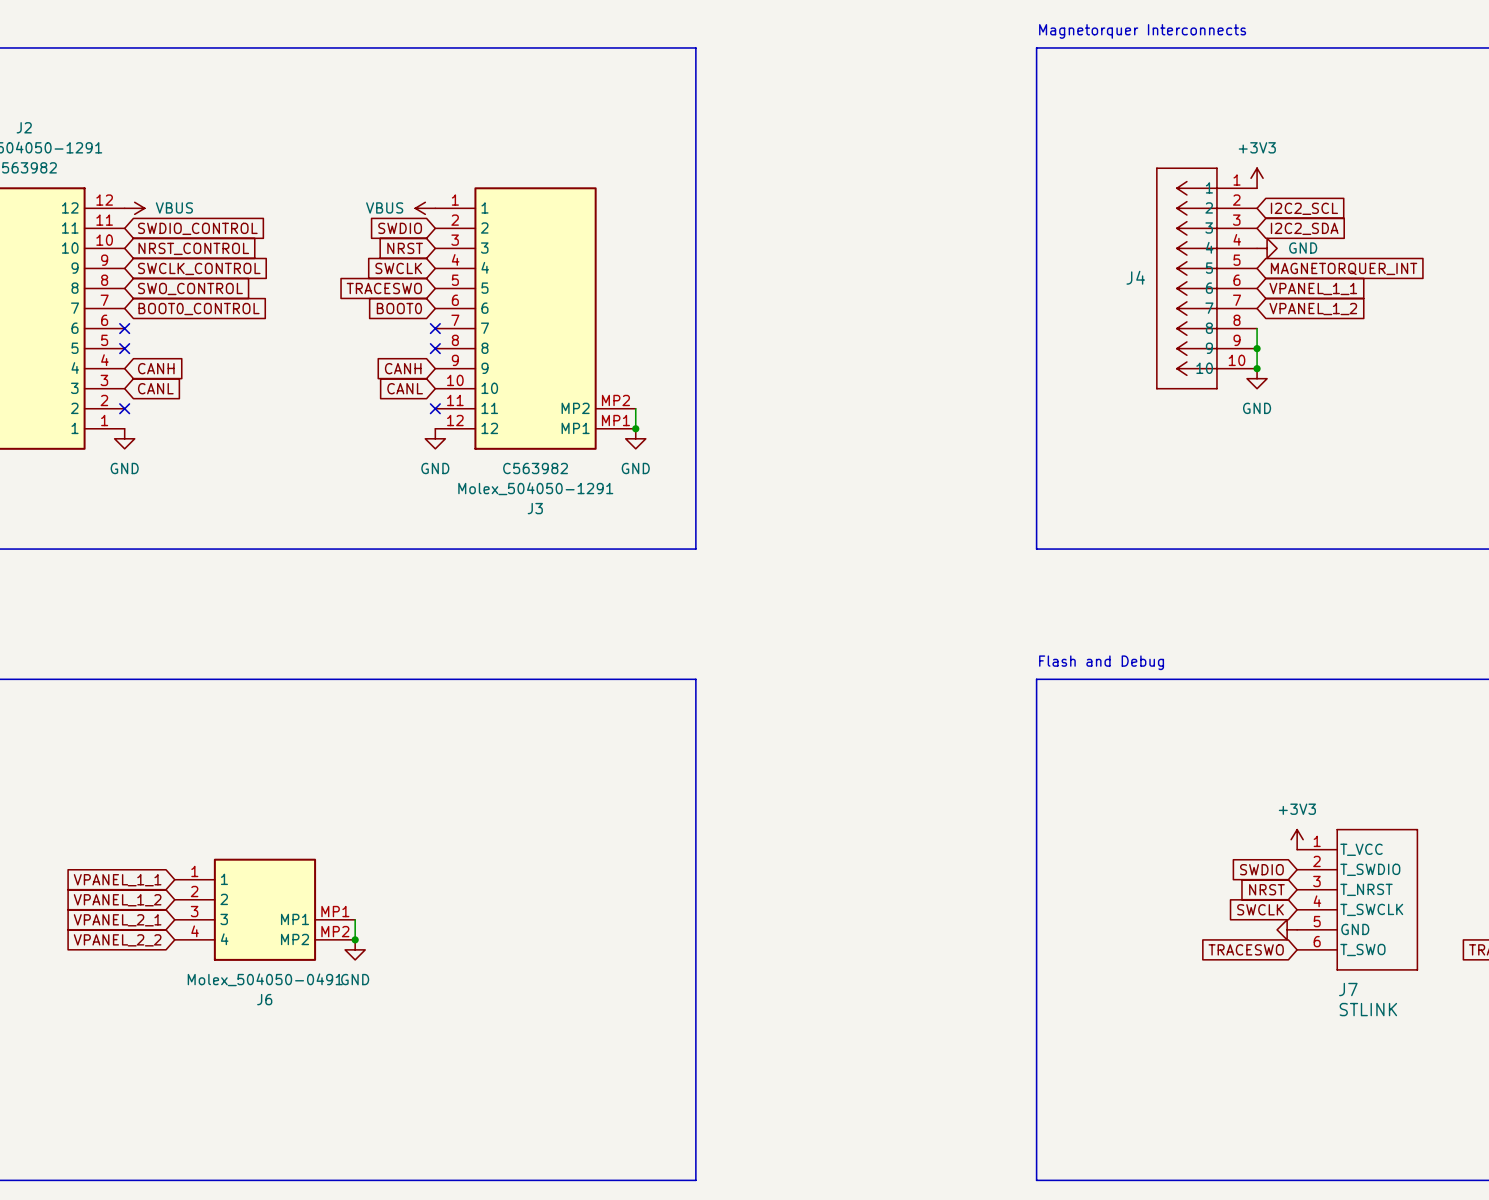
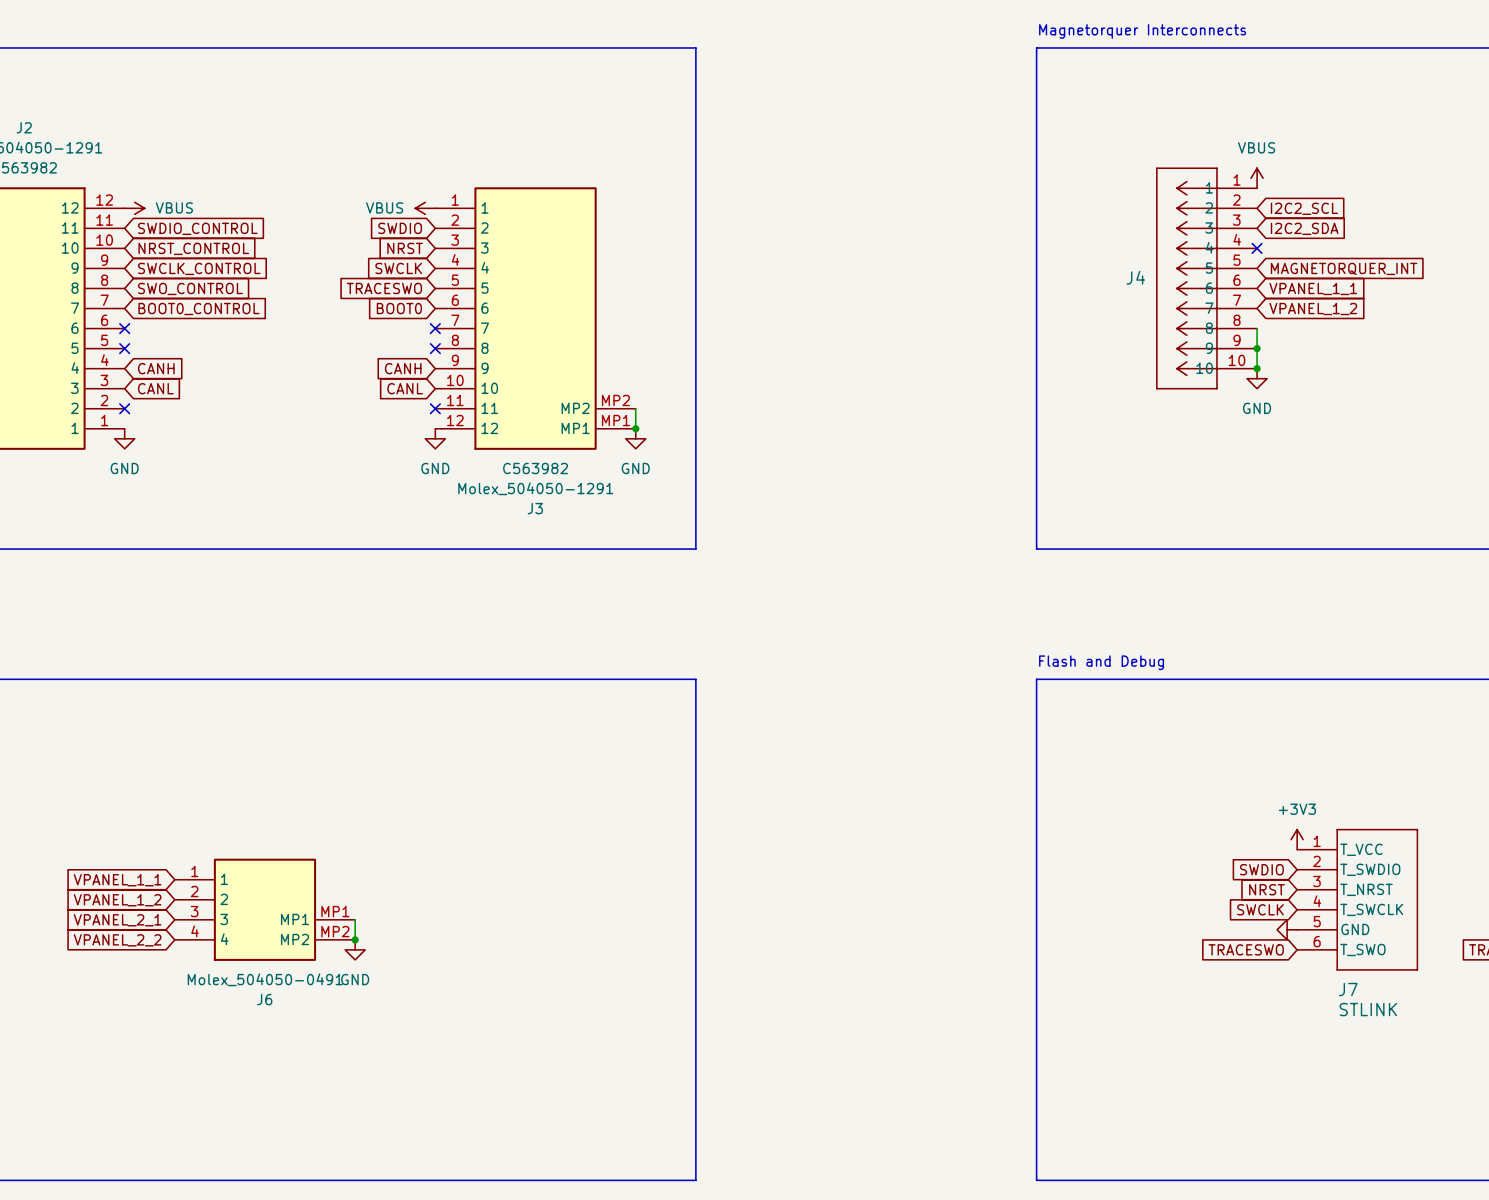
power symbol: +3V3 (1257, 178) -> VBUS (1257, 178)
no-connect mark: none -> (1257, 248)
power symbol: GND (1267, 248) -> none

